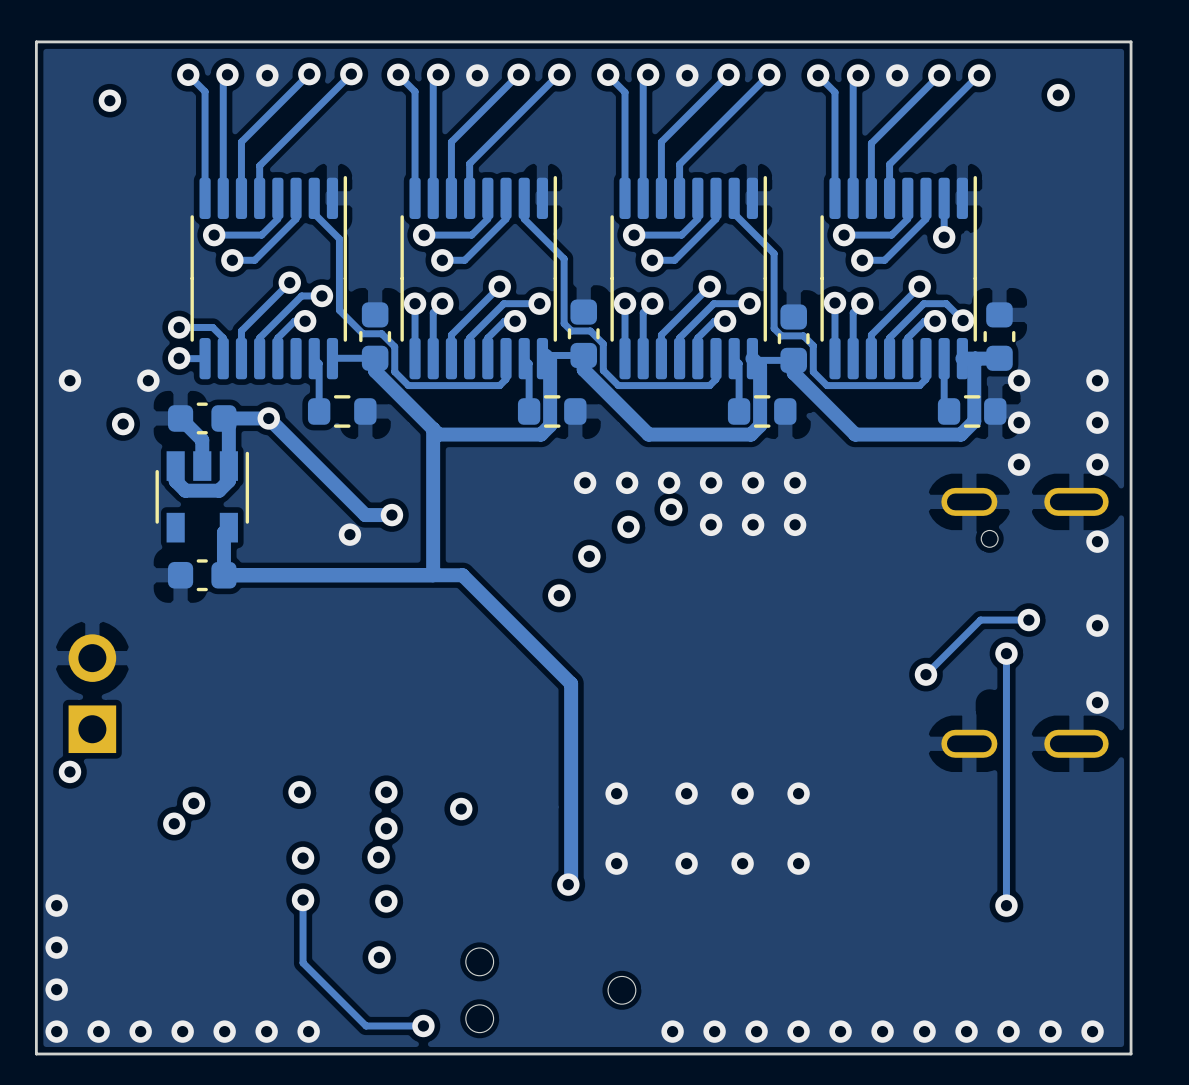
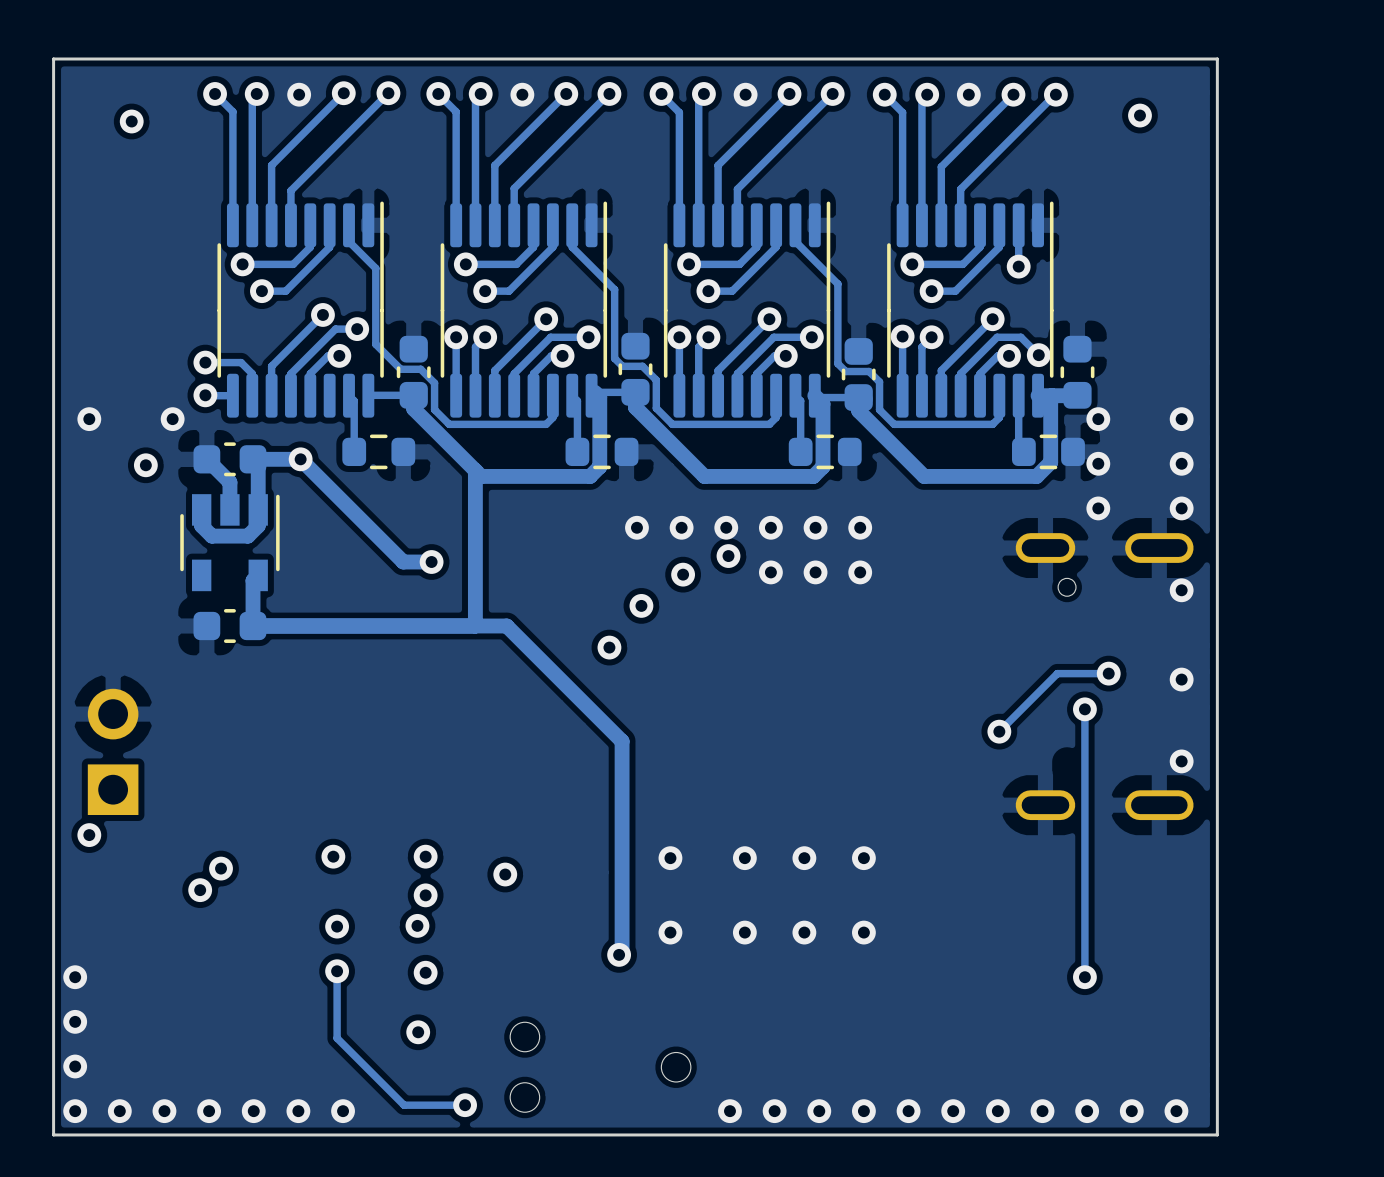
via: (349, 534) -> none

